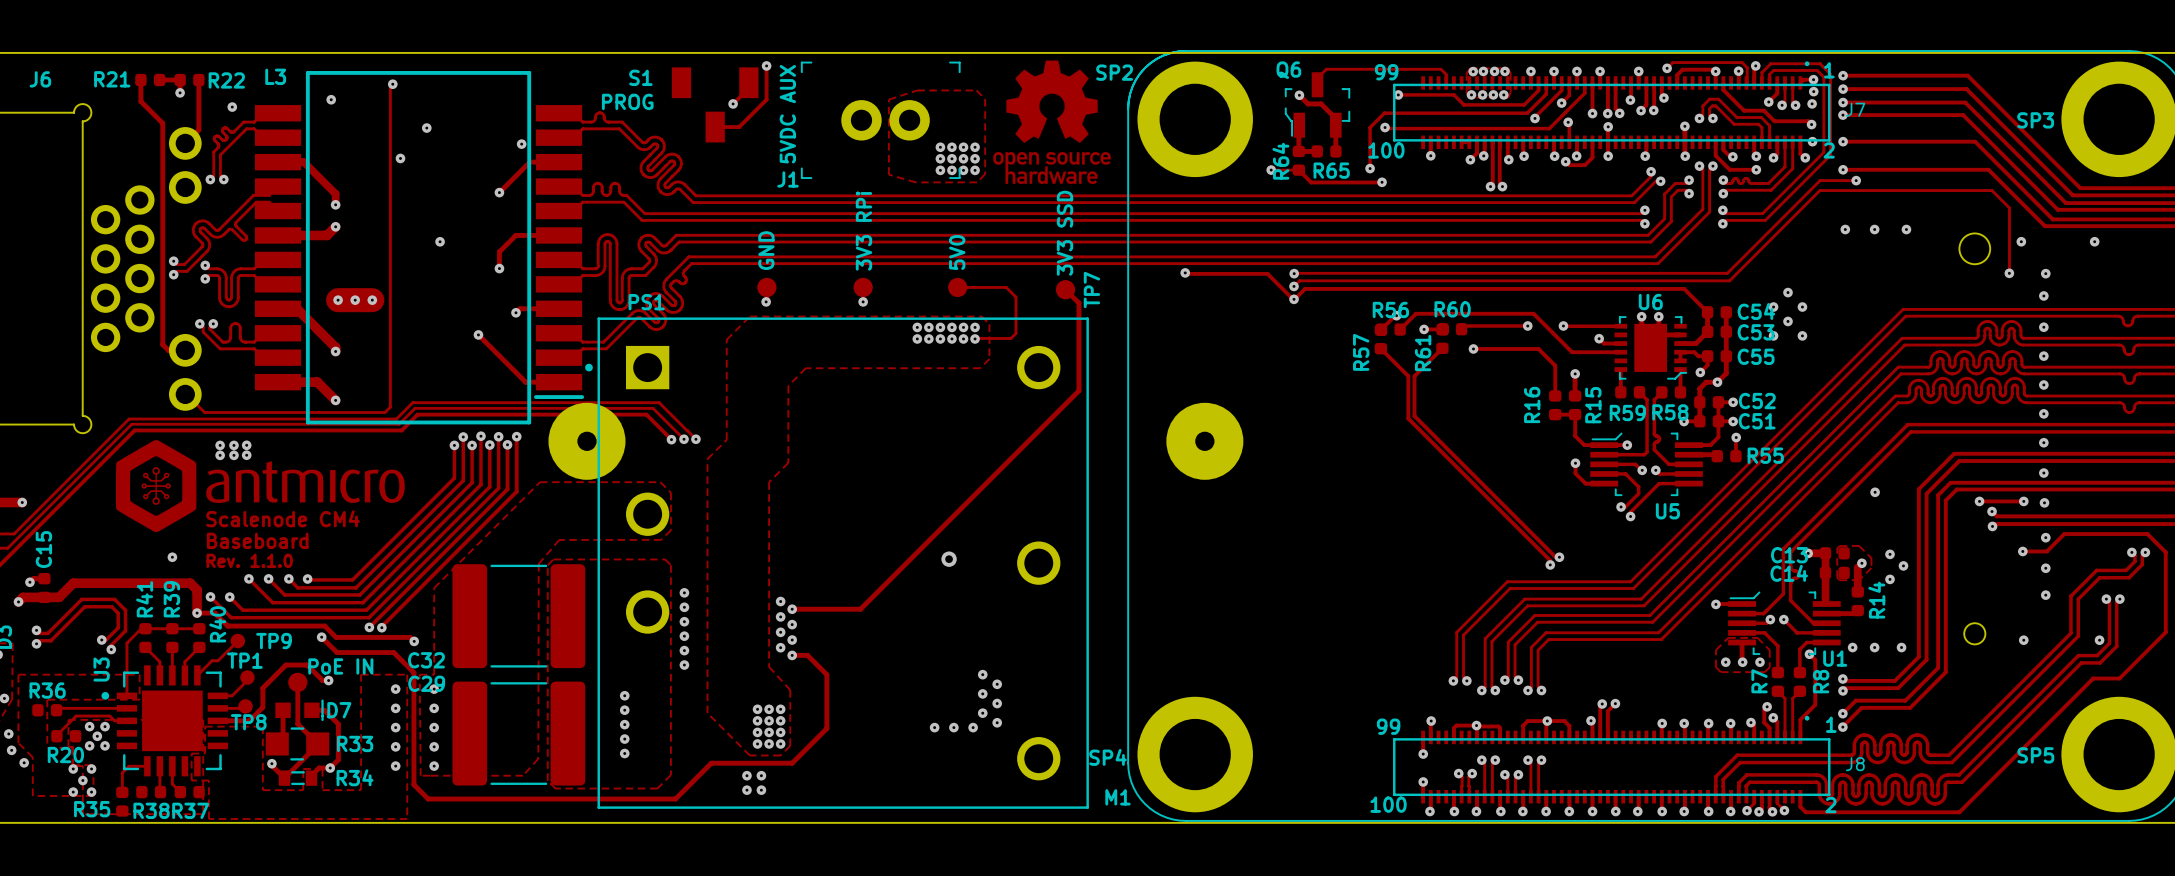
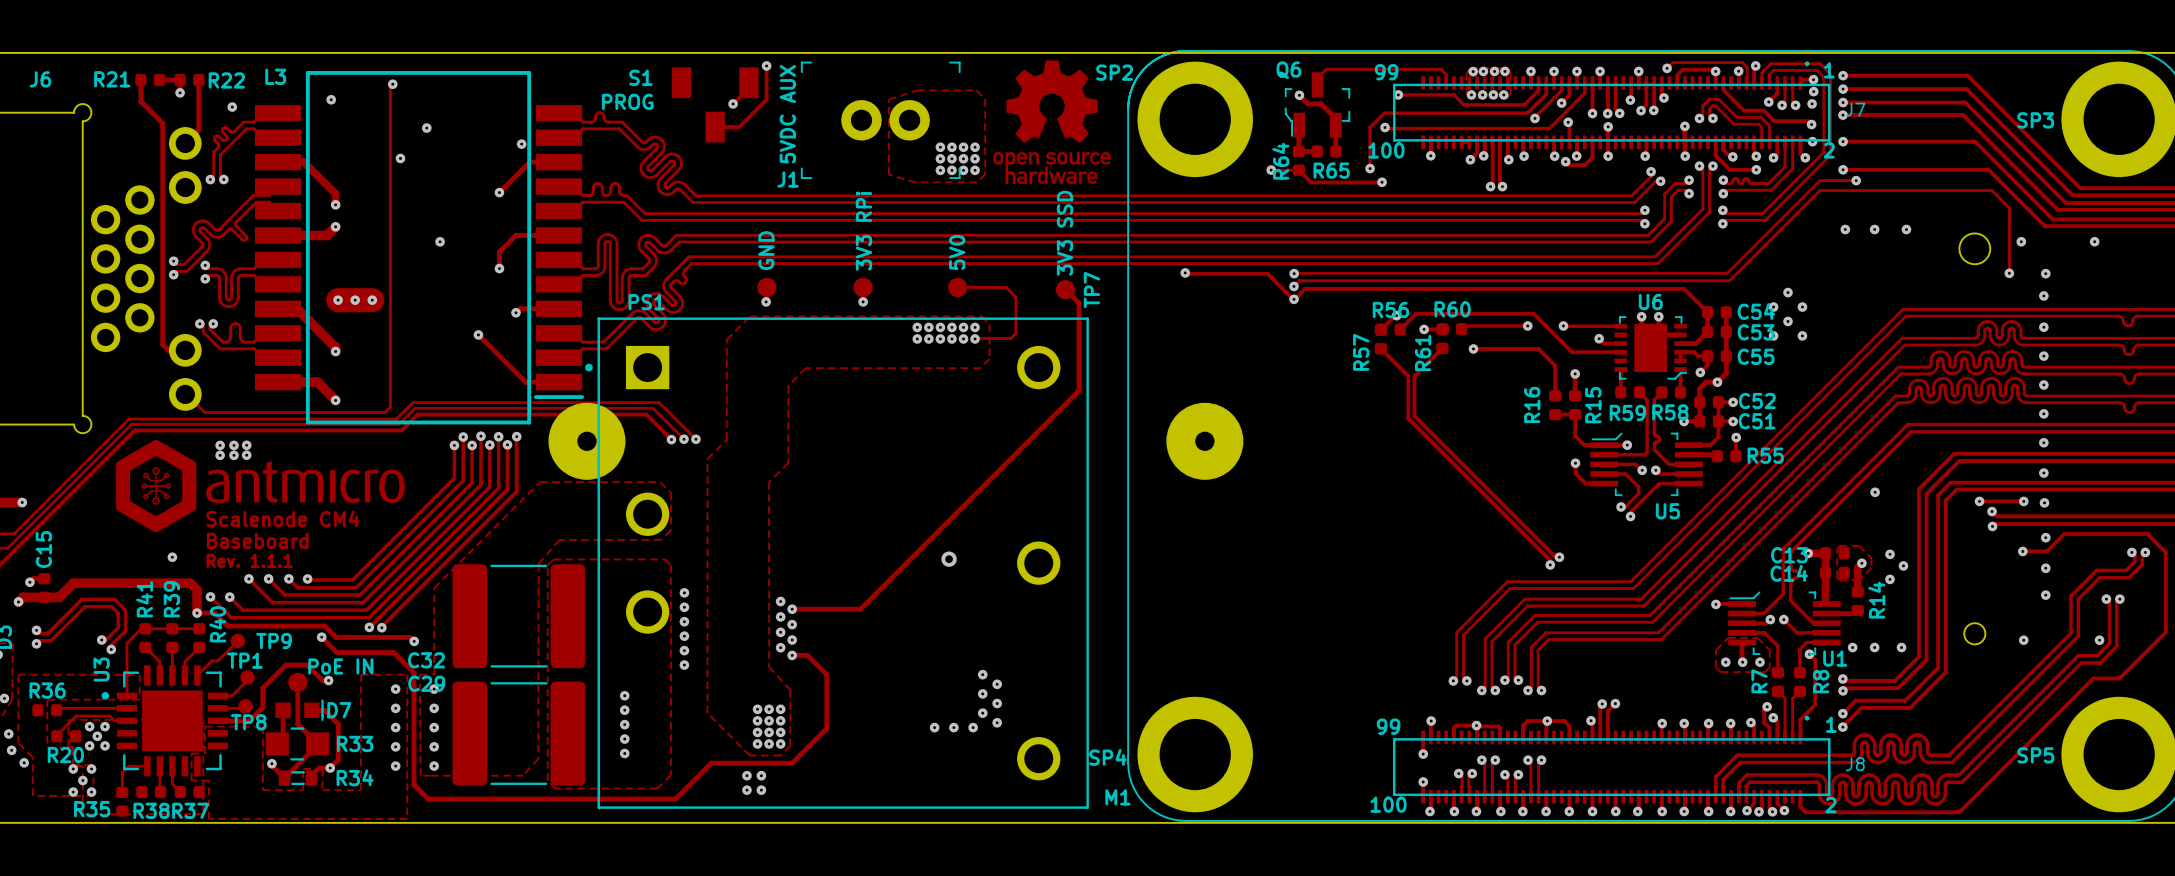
text: Rev. 1.1.0 (249, 560) -> Rev. 1.1.1 (249, 560)

